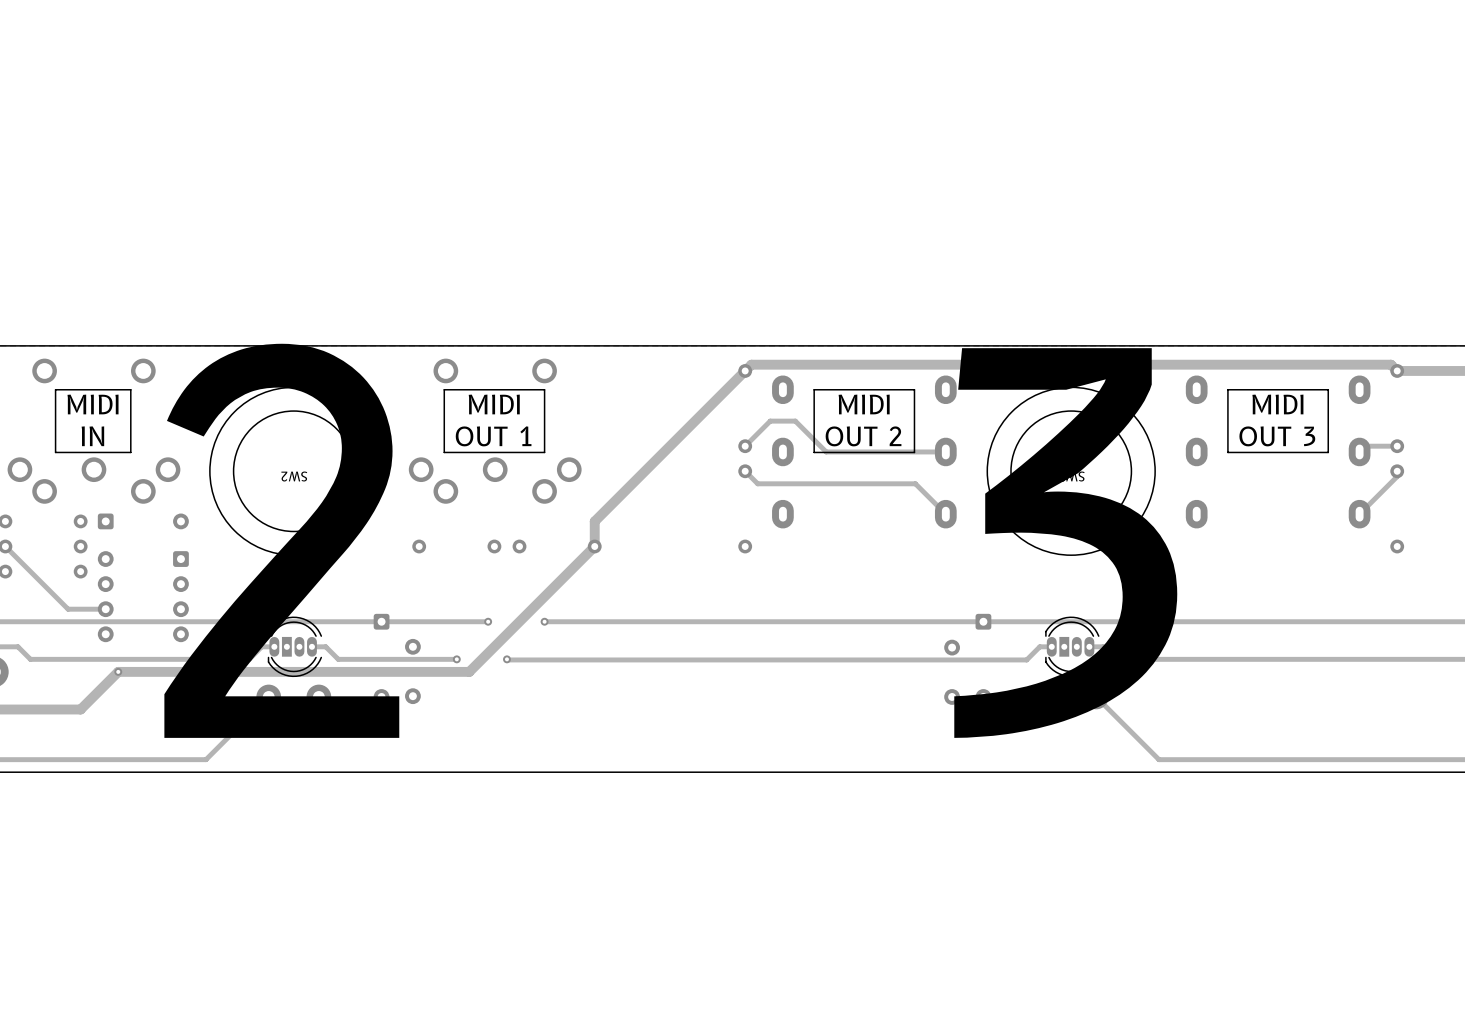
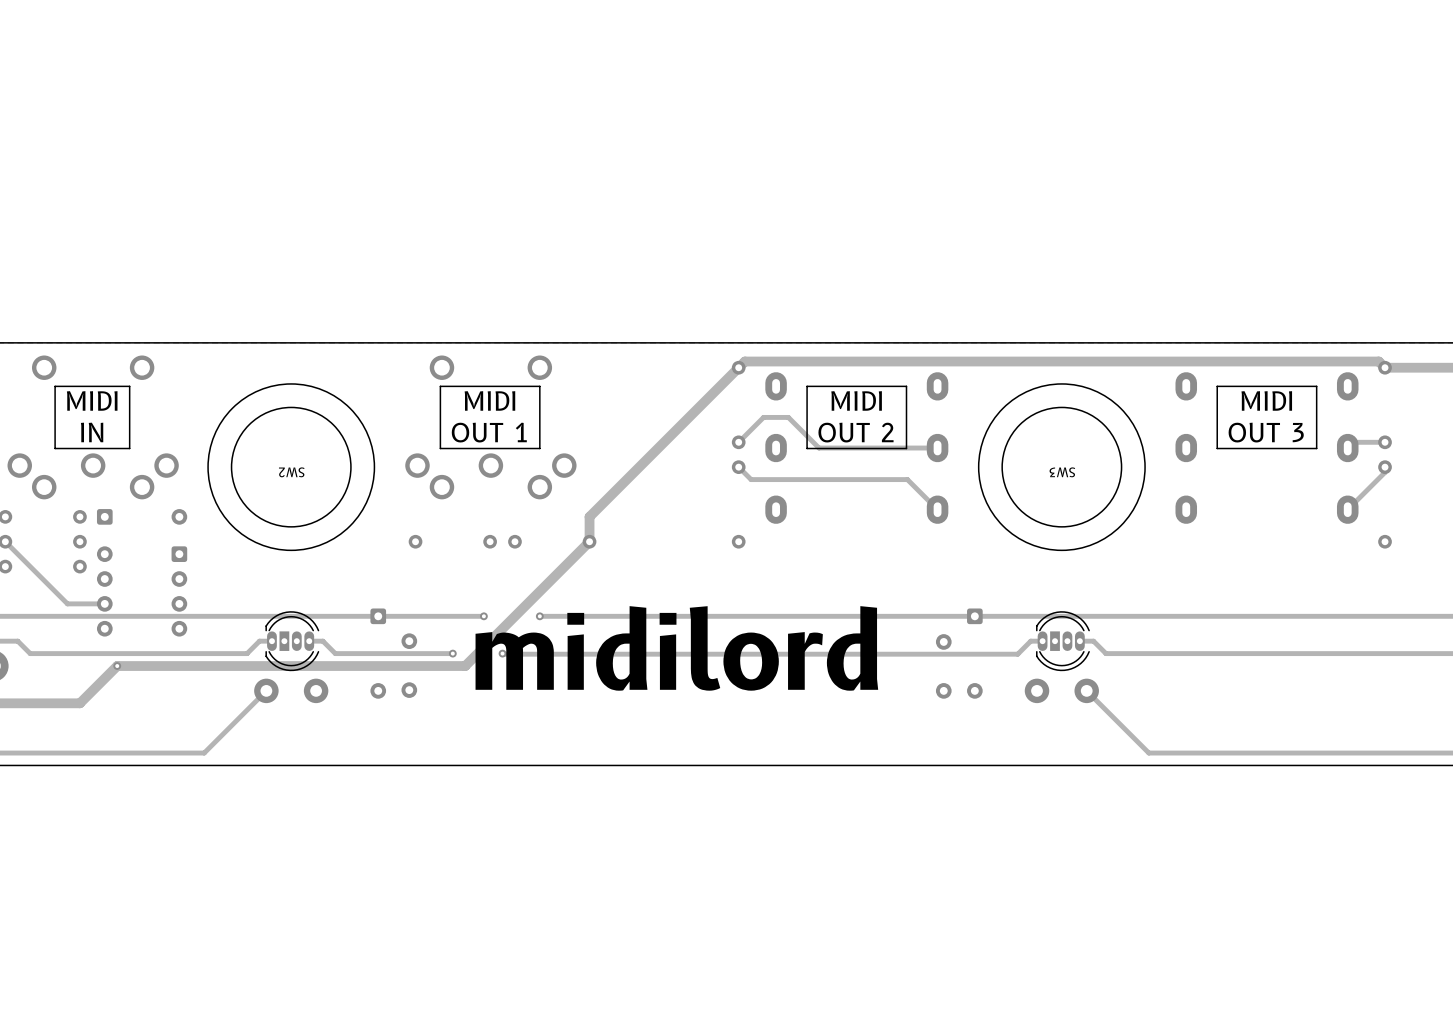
text: 2 (281, 540) -> none
text: 3 (1065, 543) -> none
text: none -> midilord (676, 648)

